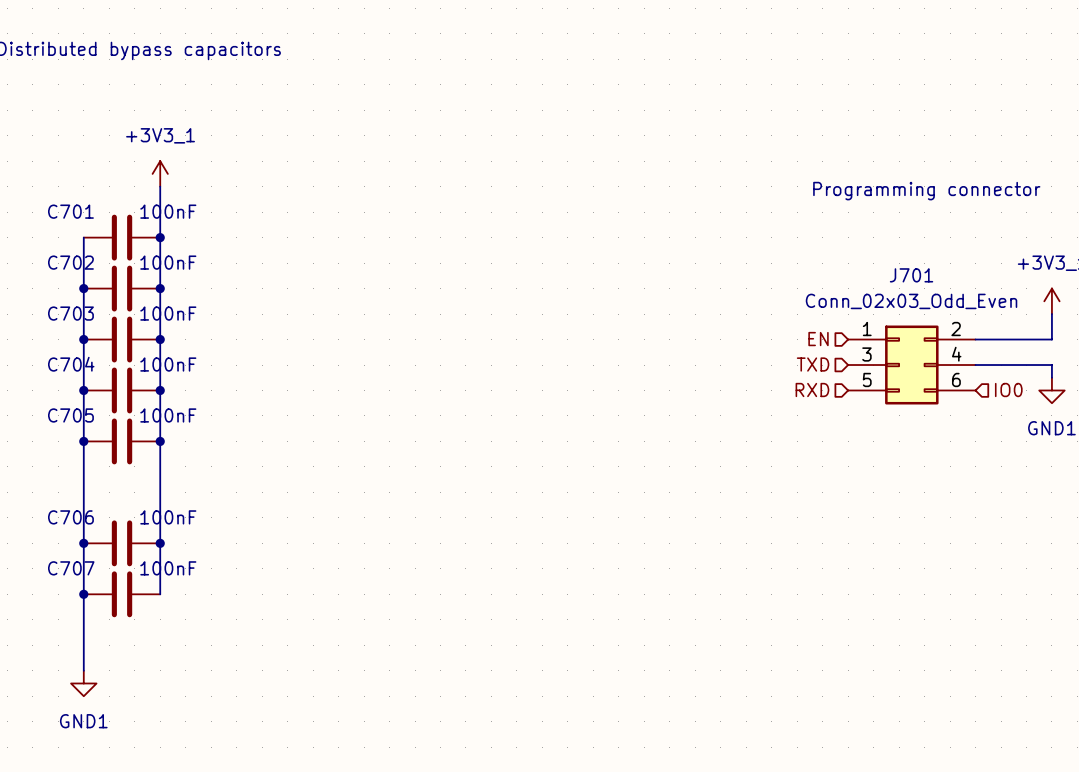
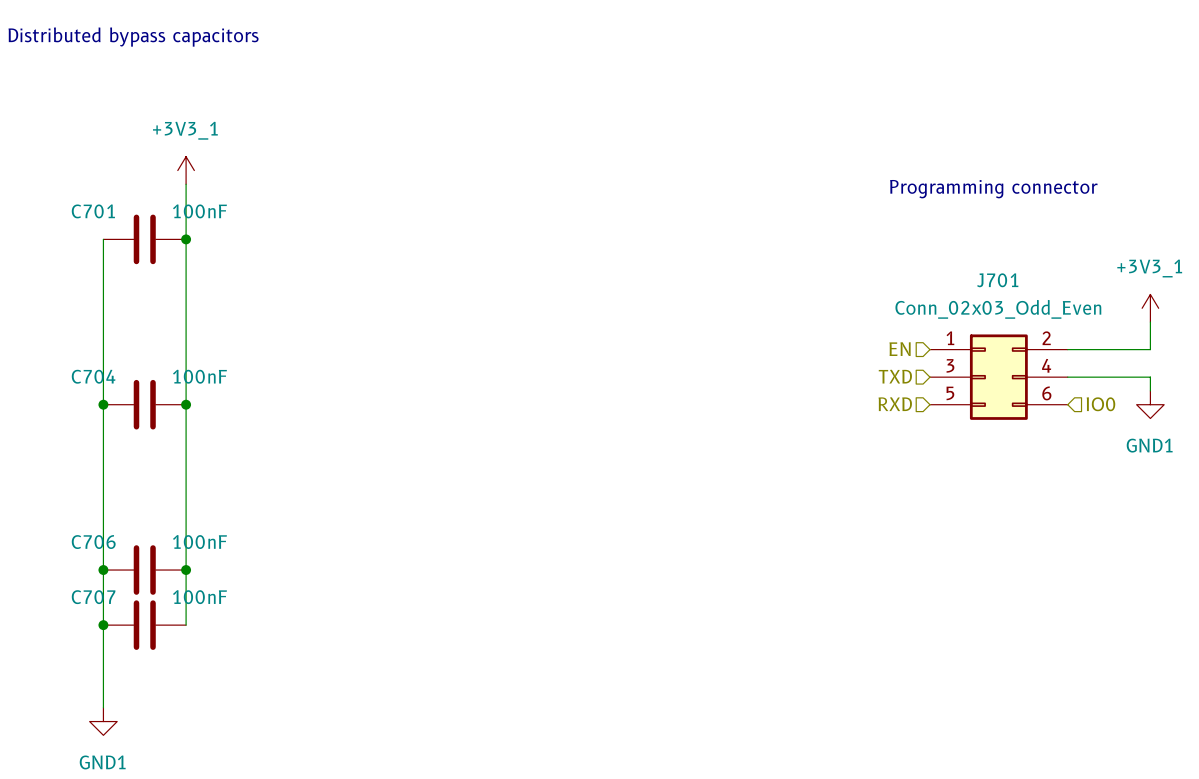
junction: (83, 288) -> none
C702: 100nF (122, 288) -> none
junction: (160, 288) -> none
junction: (83, 339) -> none
C703: 100nF (122, 339) -> none
junction: (160, 339) -> none
junction: (83, 441) -> none
C705: 100nF (122, 441) -> none
junction: (160, 441) -> none

